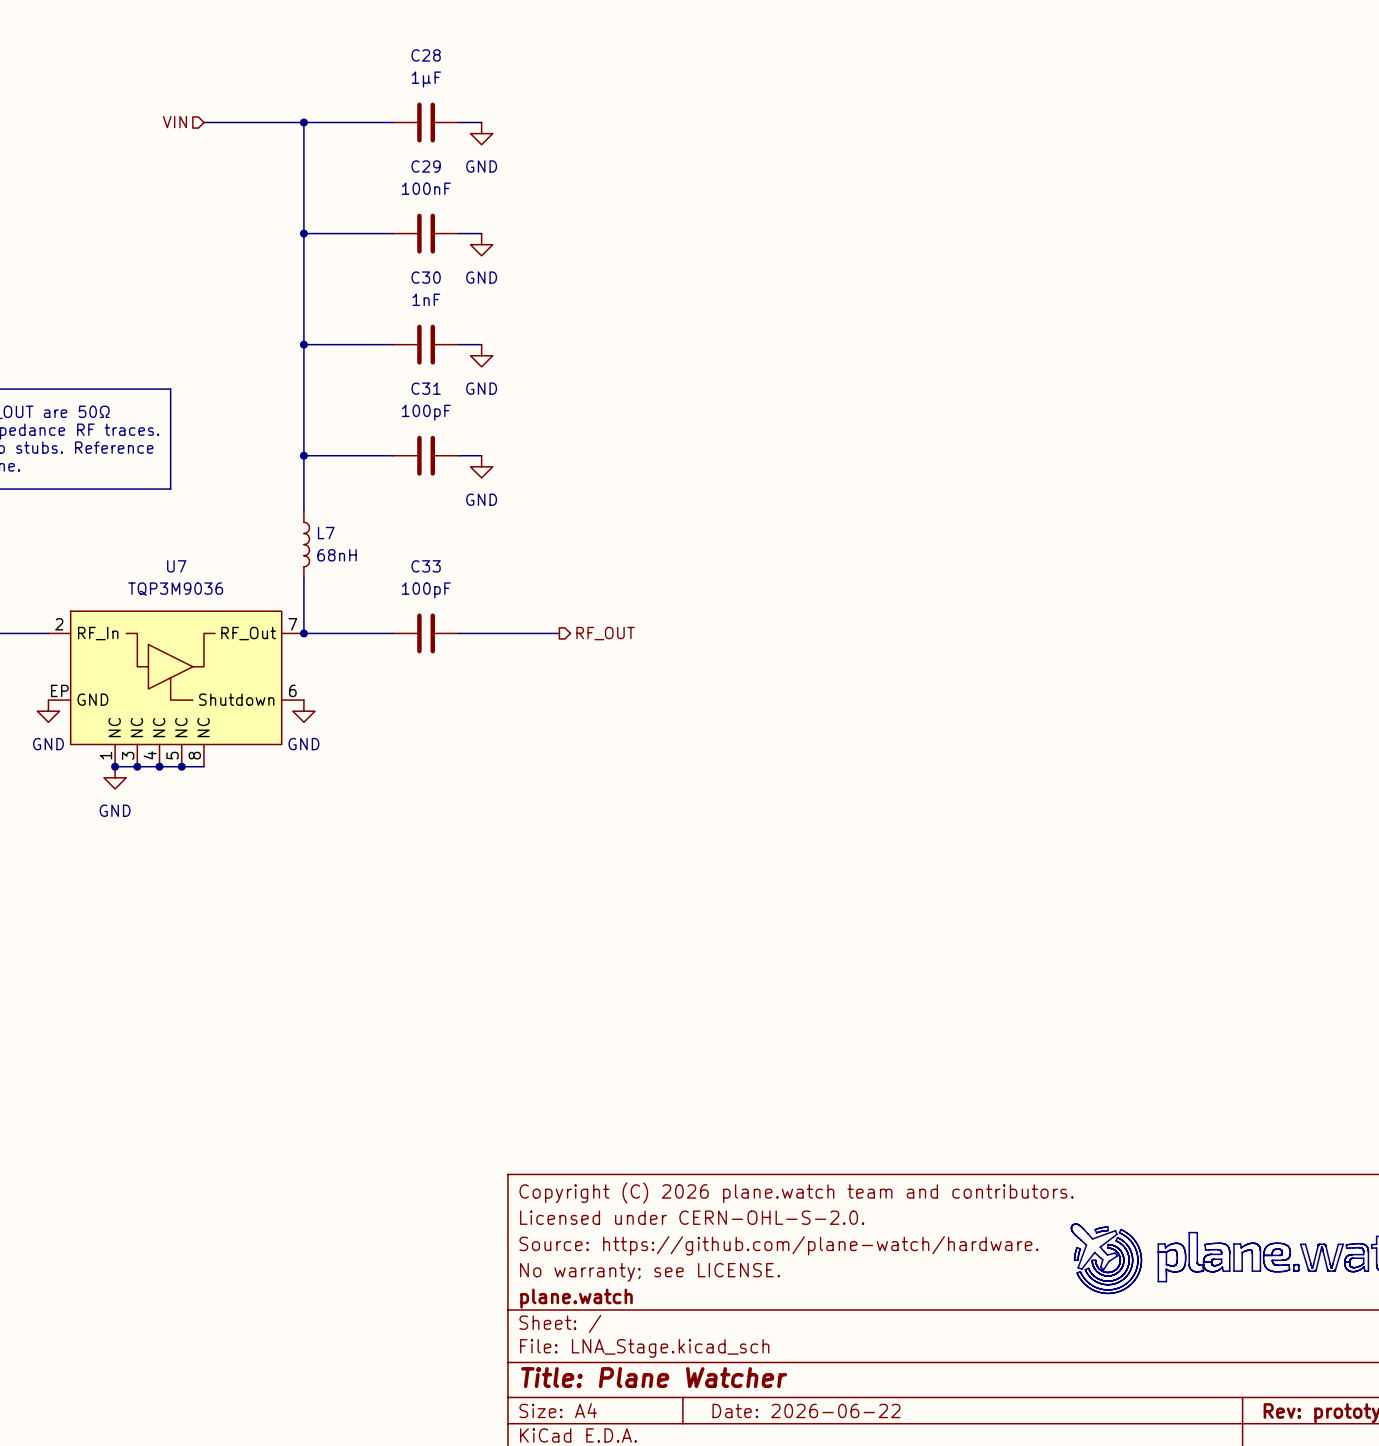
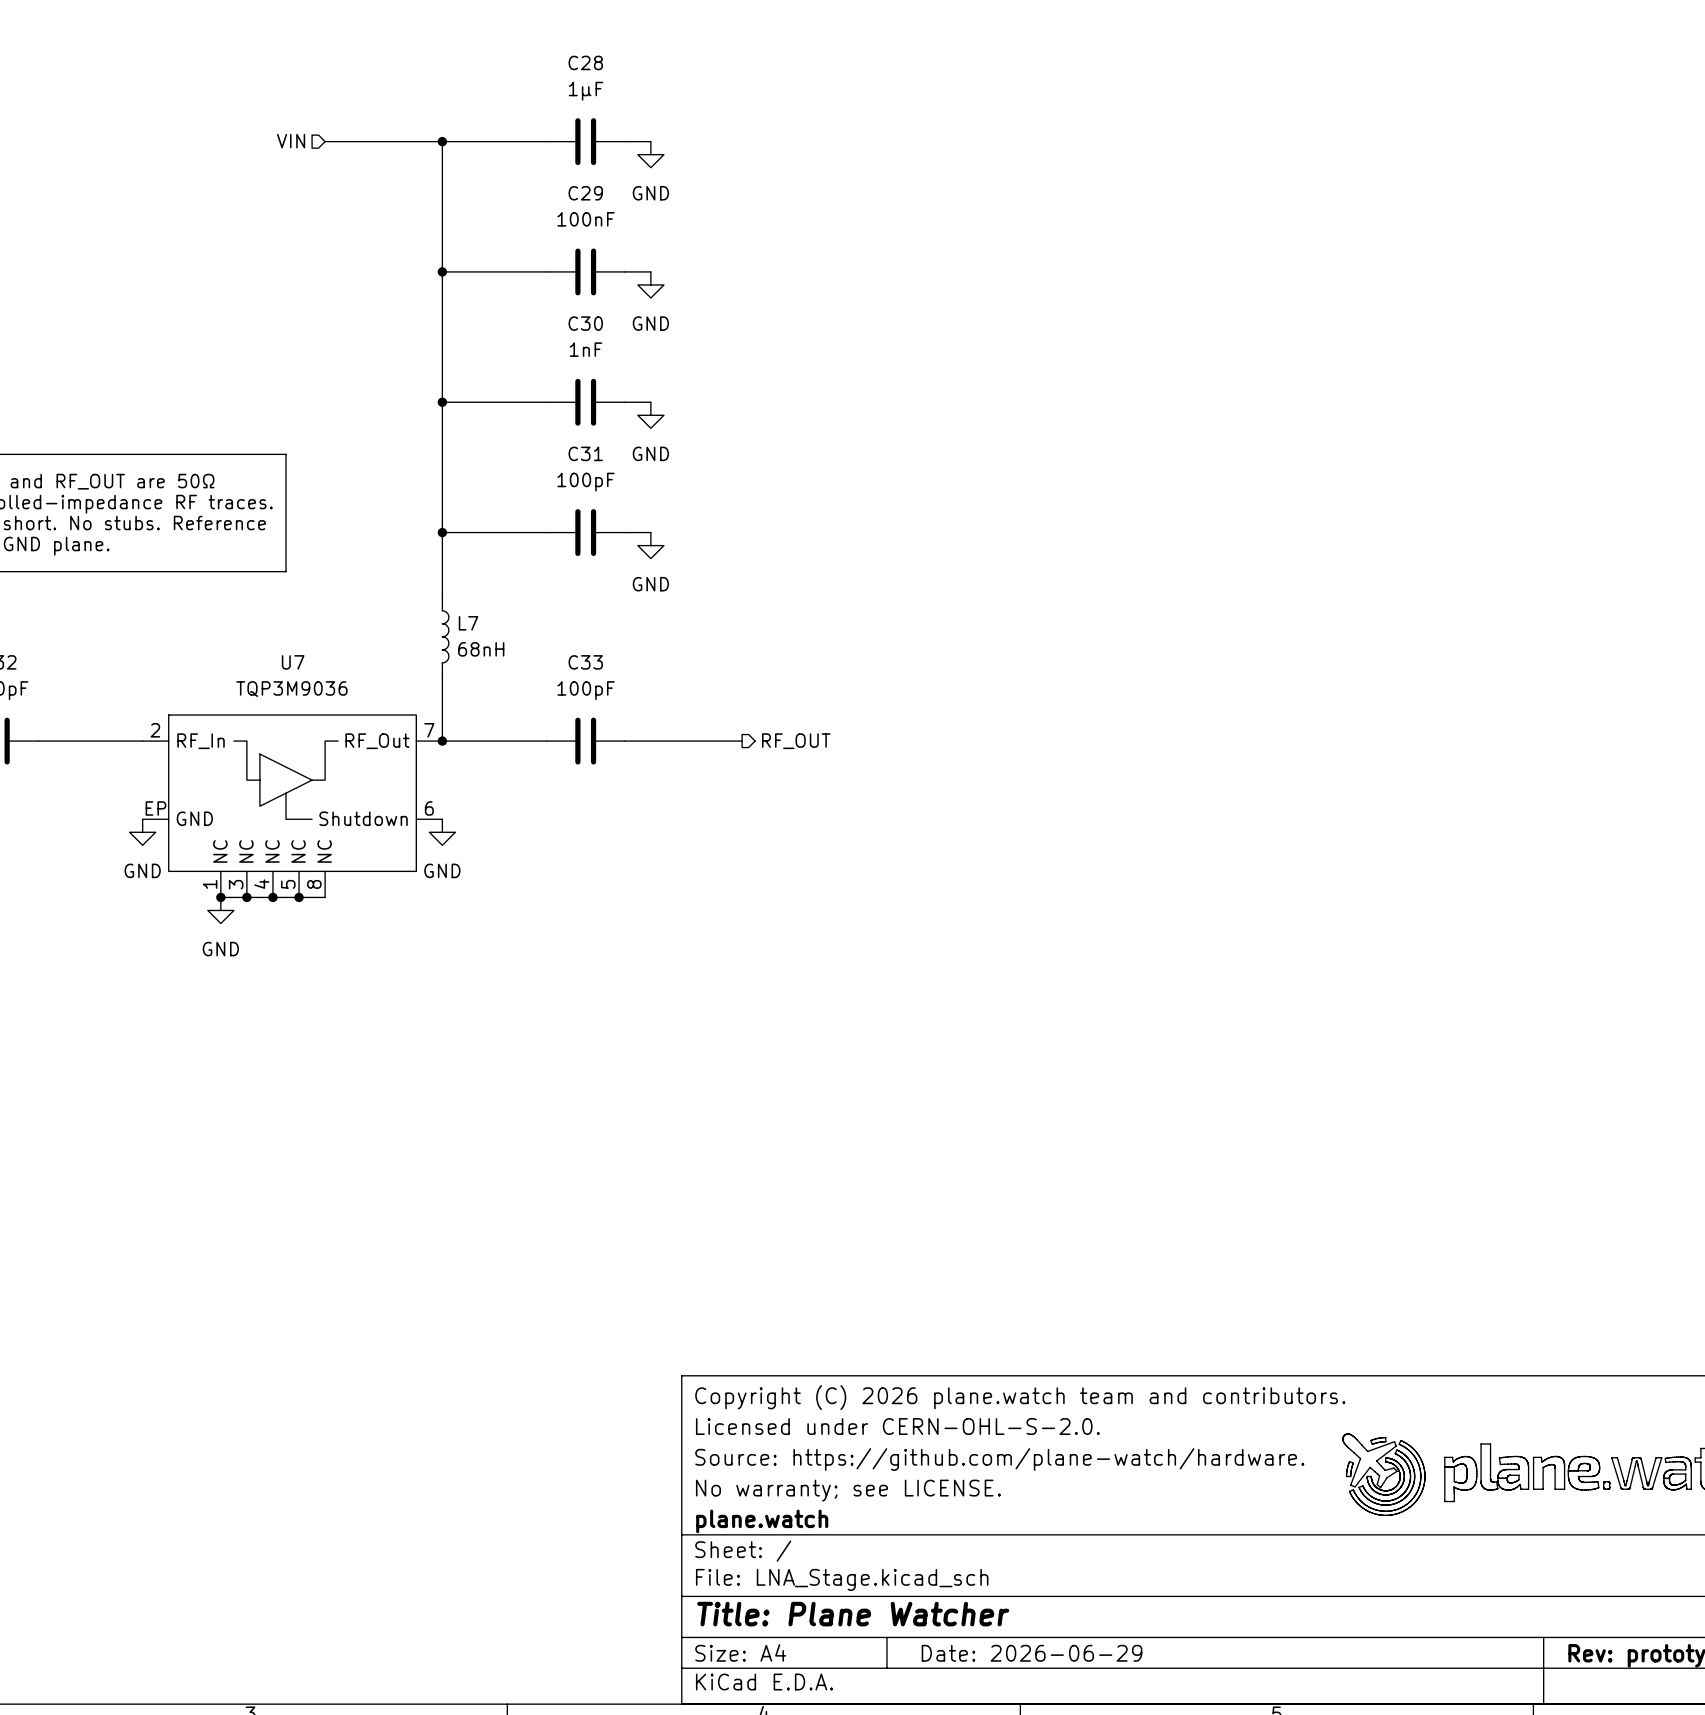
title block: Date: 2026-06-22 (806, 1410) -> Date: 2026-06-29 (1032, 1653)

